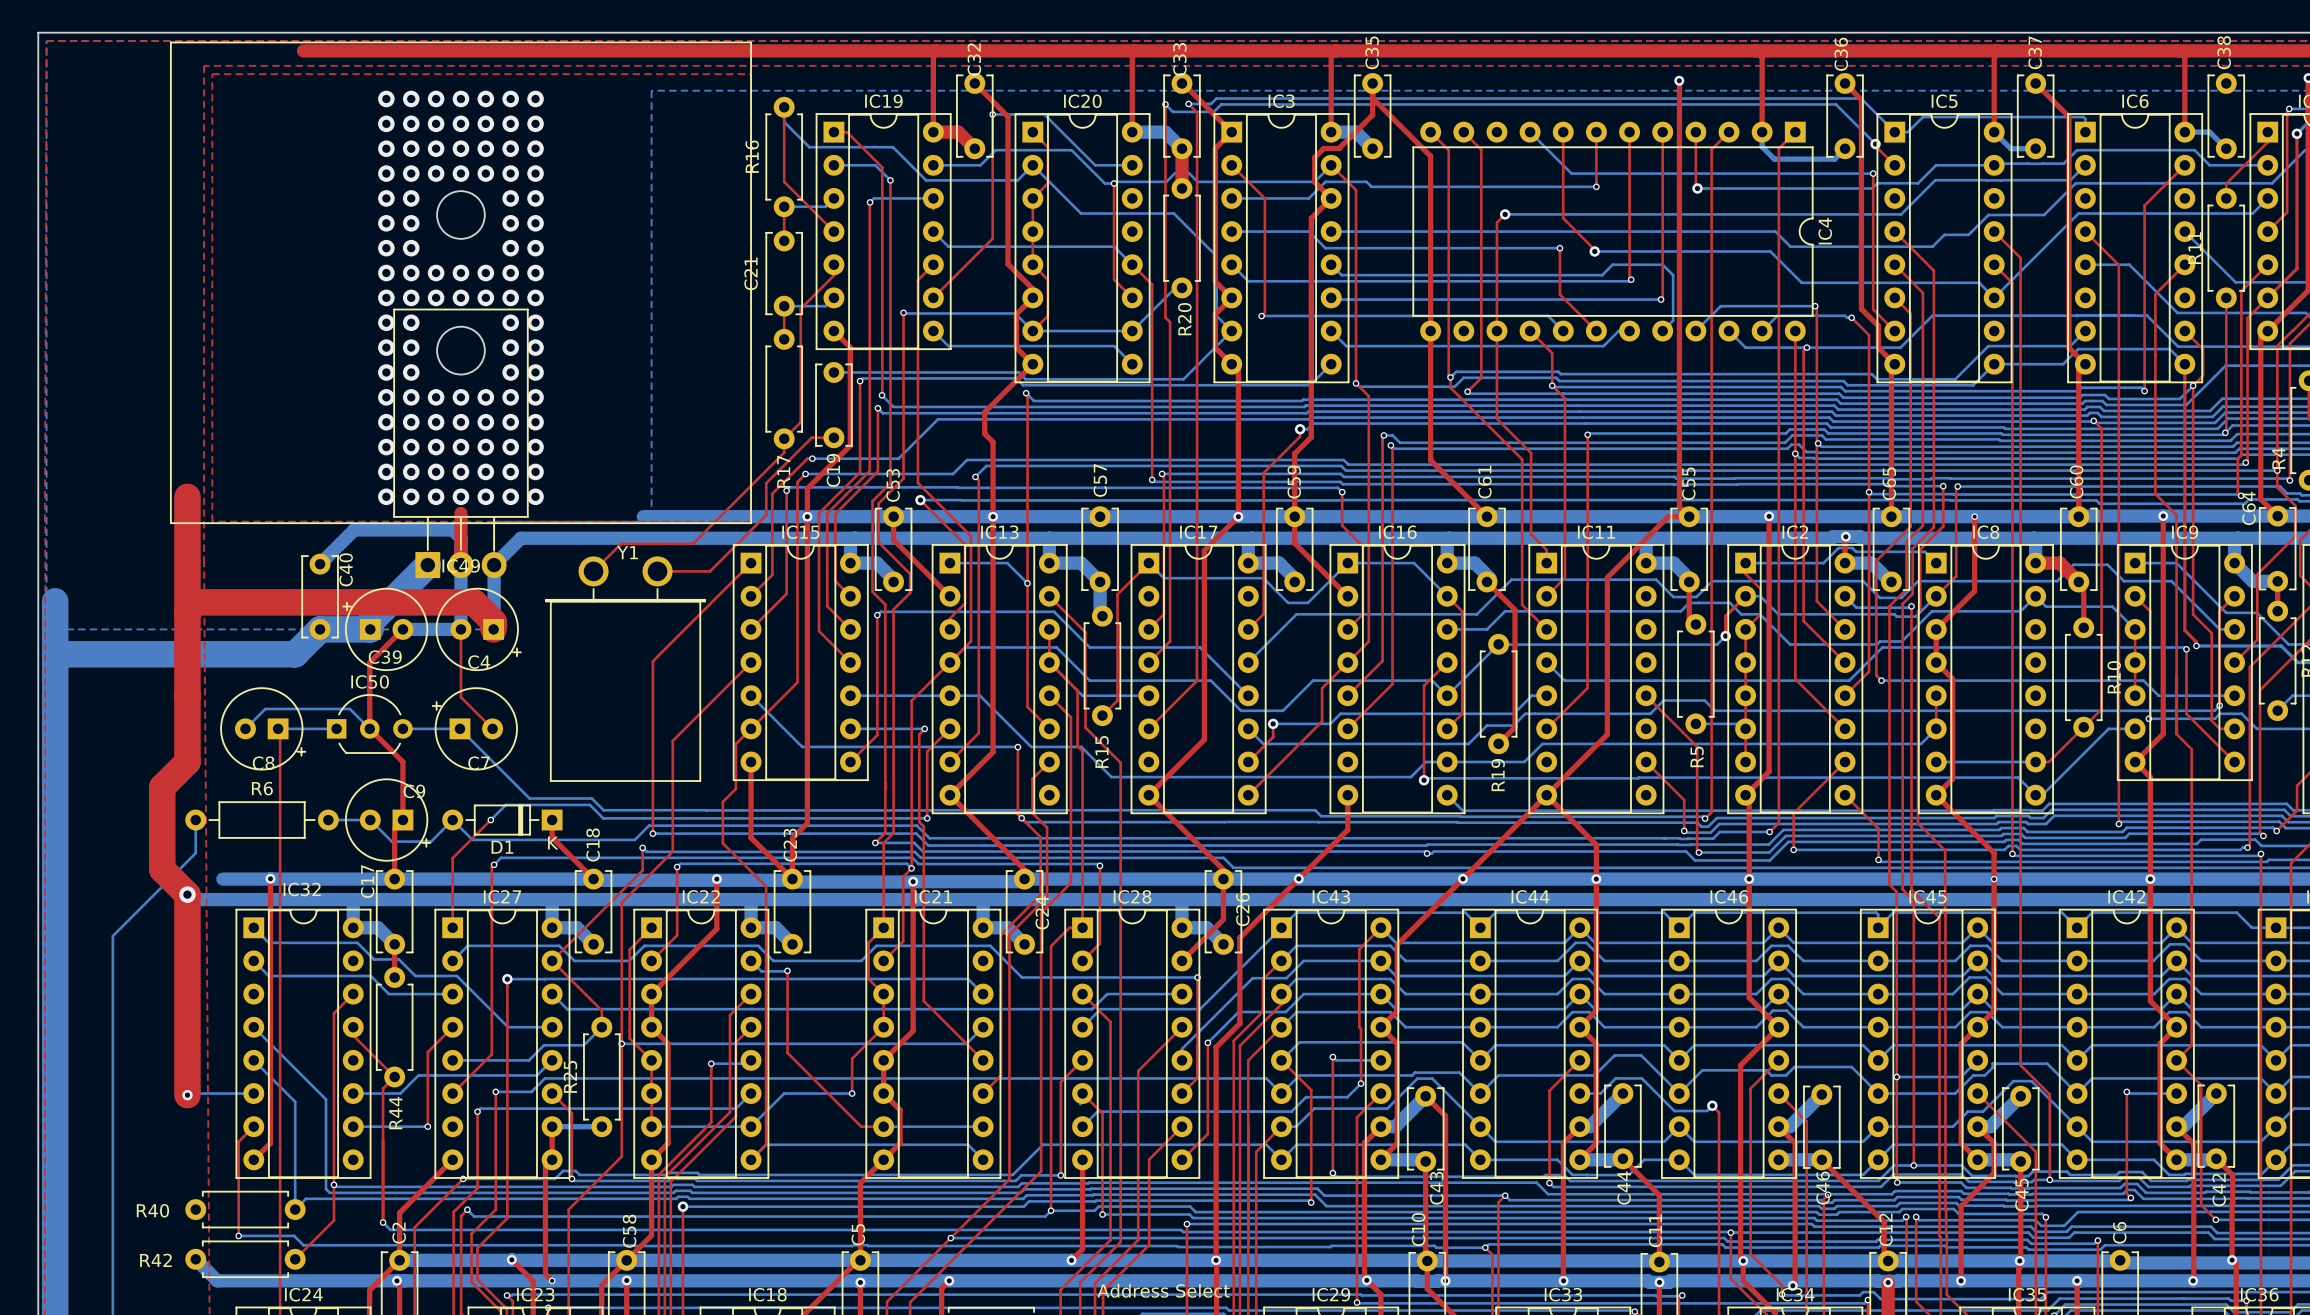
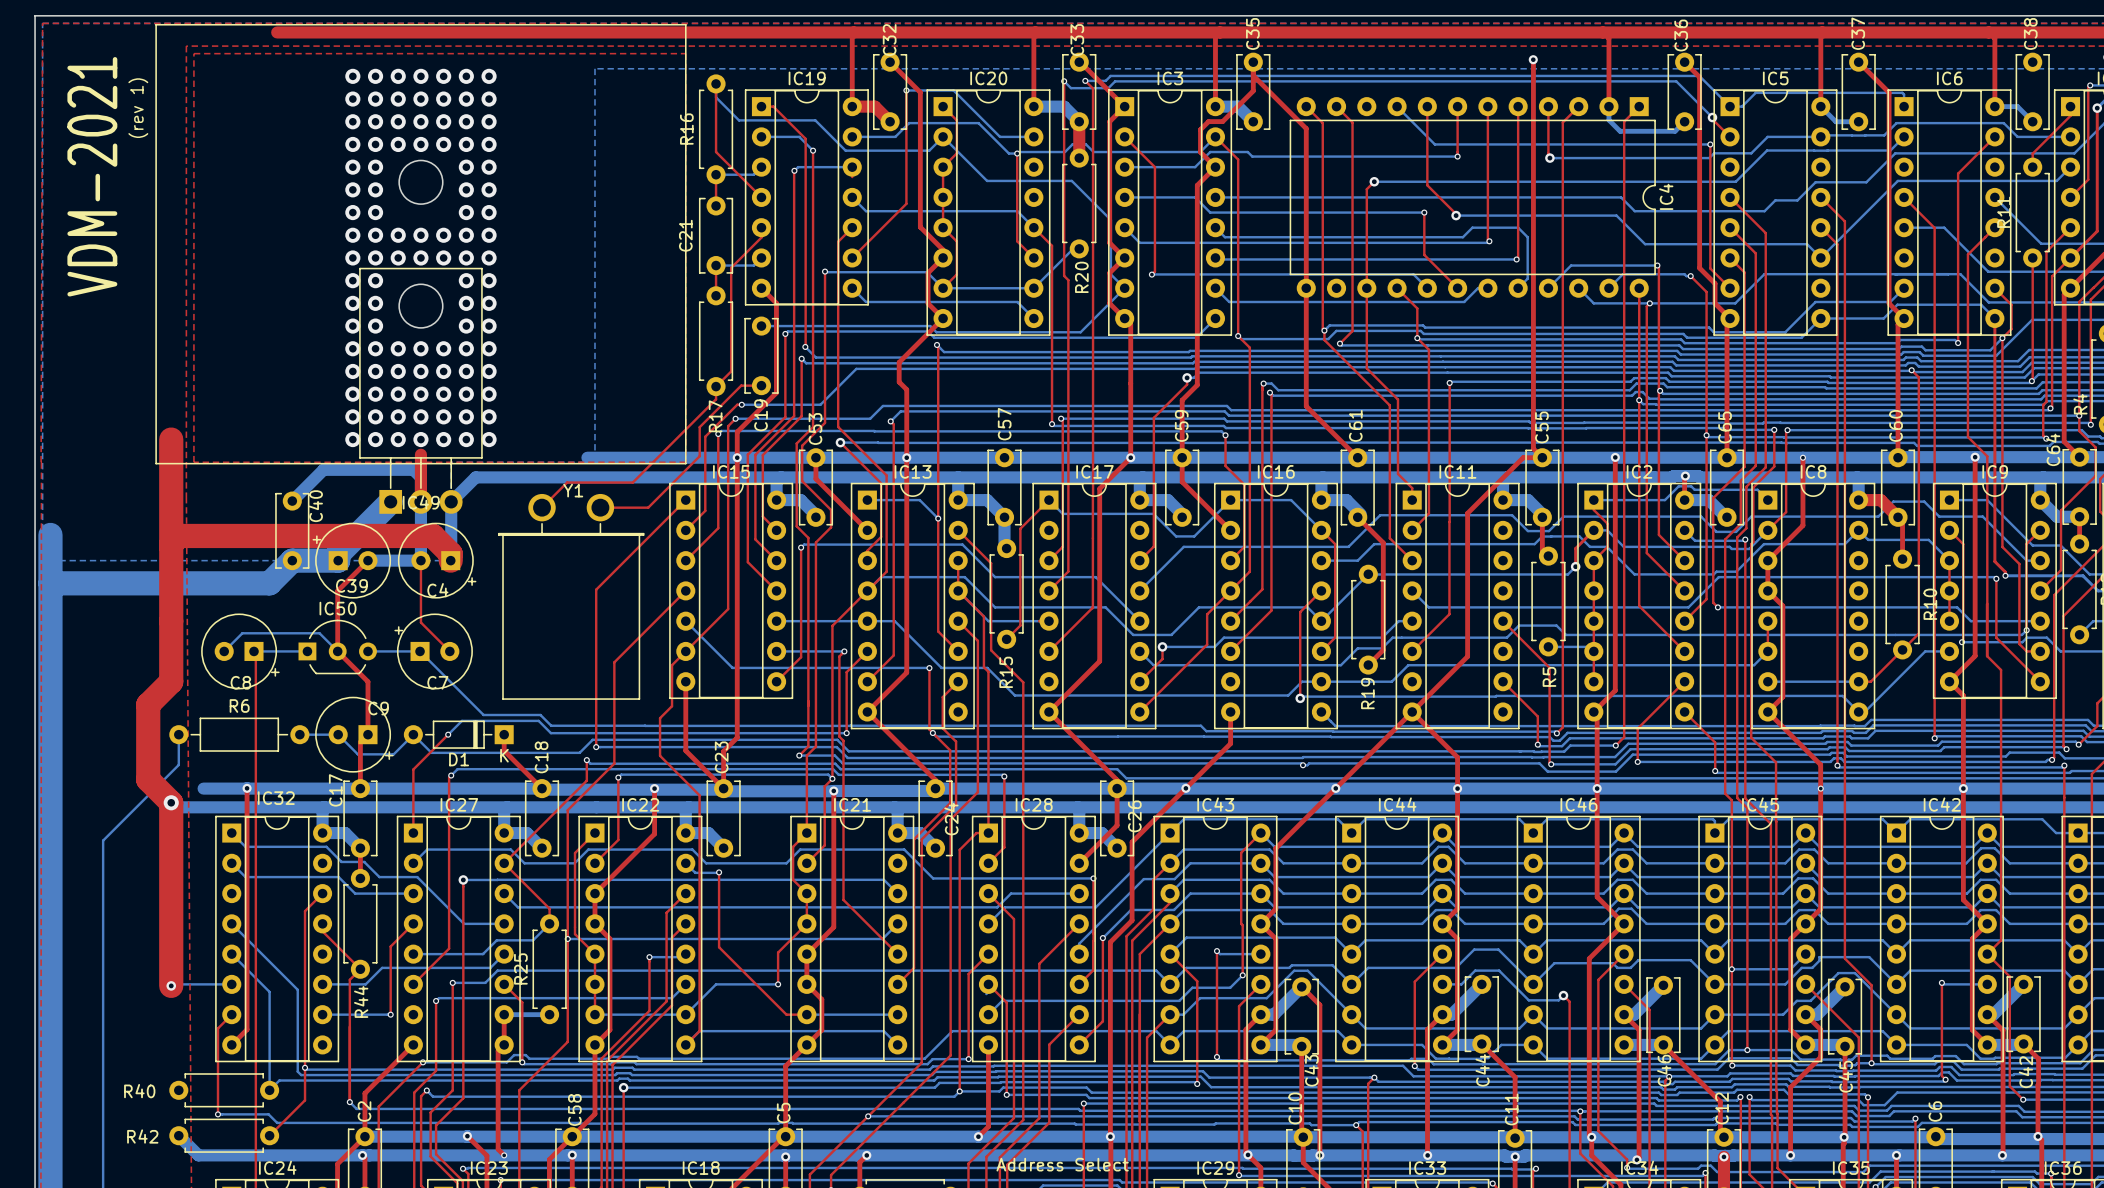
text: none -> (rev 1) (138, 108)
text: none -> VDM-2021 (92, 176)

